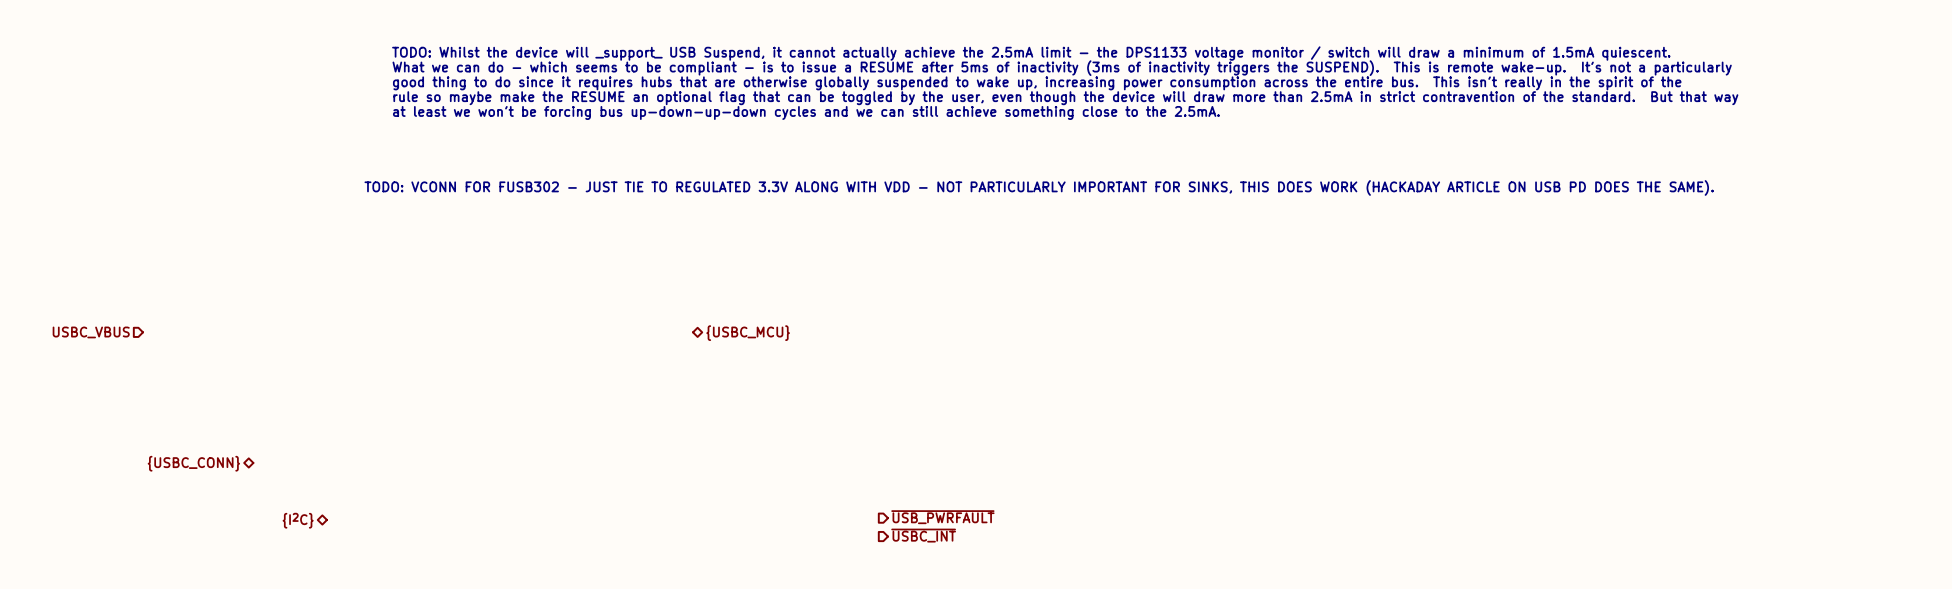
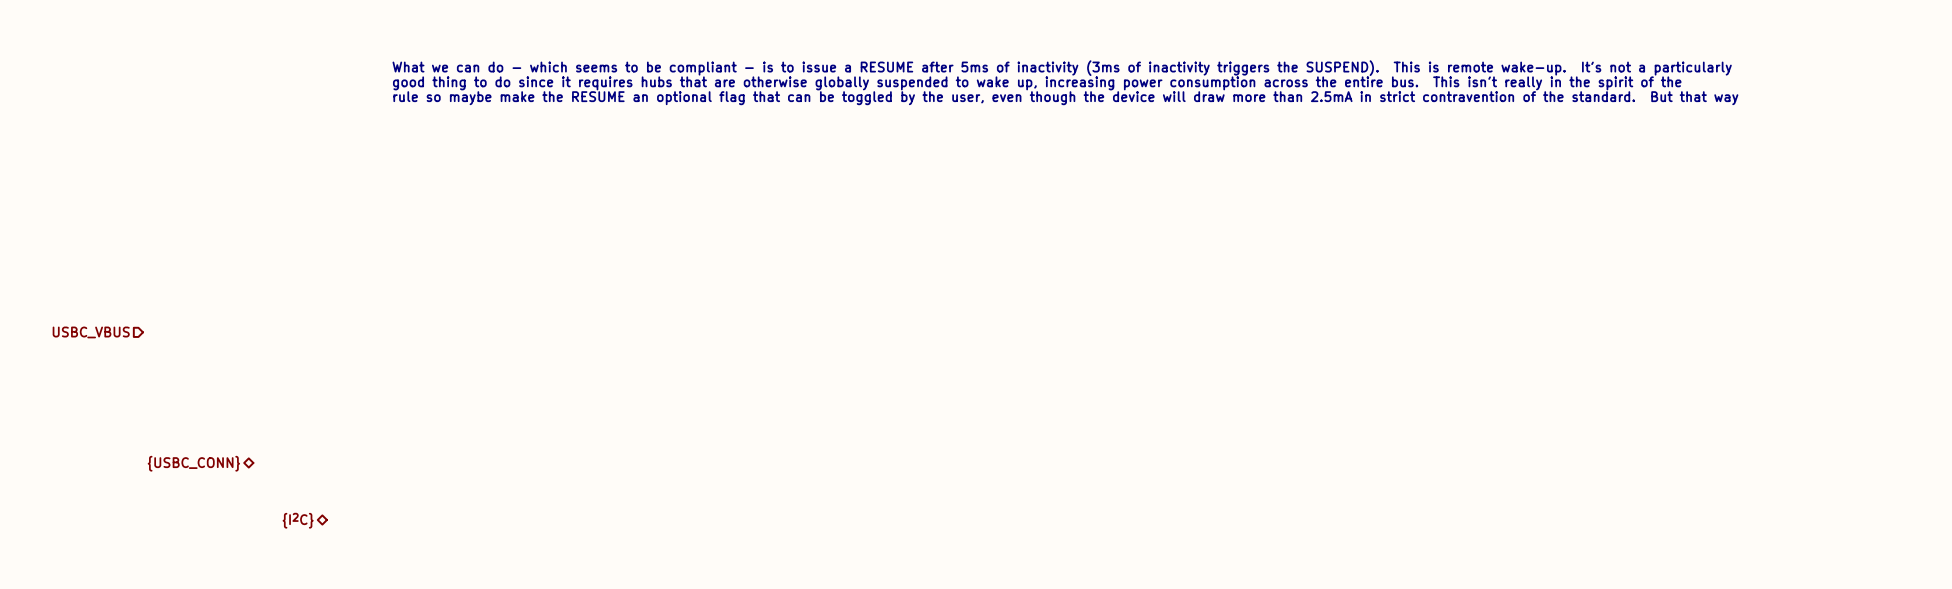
text: TODO: Whilst the device will _support_ USB Suspend, it cannot actually achieve the 2.5mA limit - the DPS1133 voltage monitor / switch will draw a minimum of 1.5mA quiescent. (1031, 53) -> none
text: at least we won't be forcing bus up-down-up-down cycles and we can still achieve something close to the 2.5mA. (806, 112) -> none
text: TODO: VCONN FOR FUSB302 - JUST TIE TO REGULATED 3.3V ALONG WITH VDD - NOT PARTICULARLY IMPORTANT FOR SINKS, THIS DOES WORK (HACKADAY ARTICLE ON USB PD DOES THE SAME). (1039, 187) -> none
hierarchical label: {USBC_MCU} (748, 333) -> none
hierarchical label: ~{USB_PWRFAULT} (942, 517) -> none
hierarchical label: ~{USBC_INT} (923, 535) -> none

